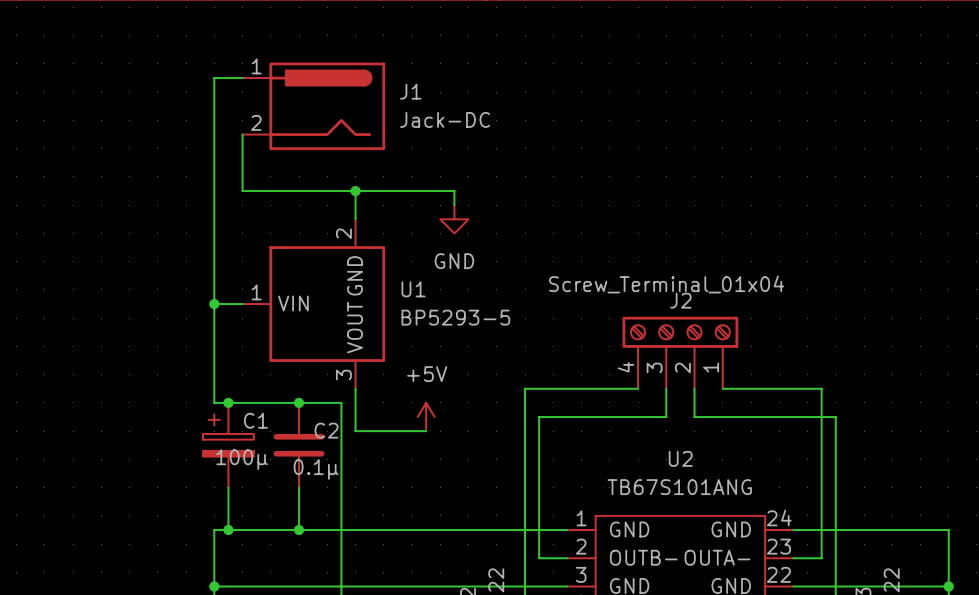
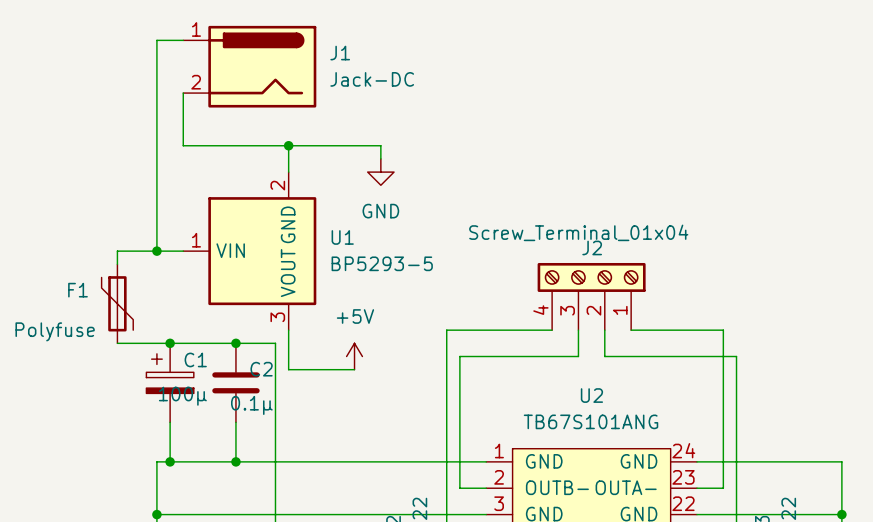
wire: (214, 304) (214, 402) -> (156, 251) (117, 251) (117, 264)
F1: none -> Polyfuse (117, 303)
wire: none -> (117, 343) (156, 343)

